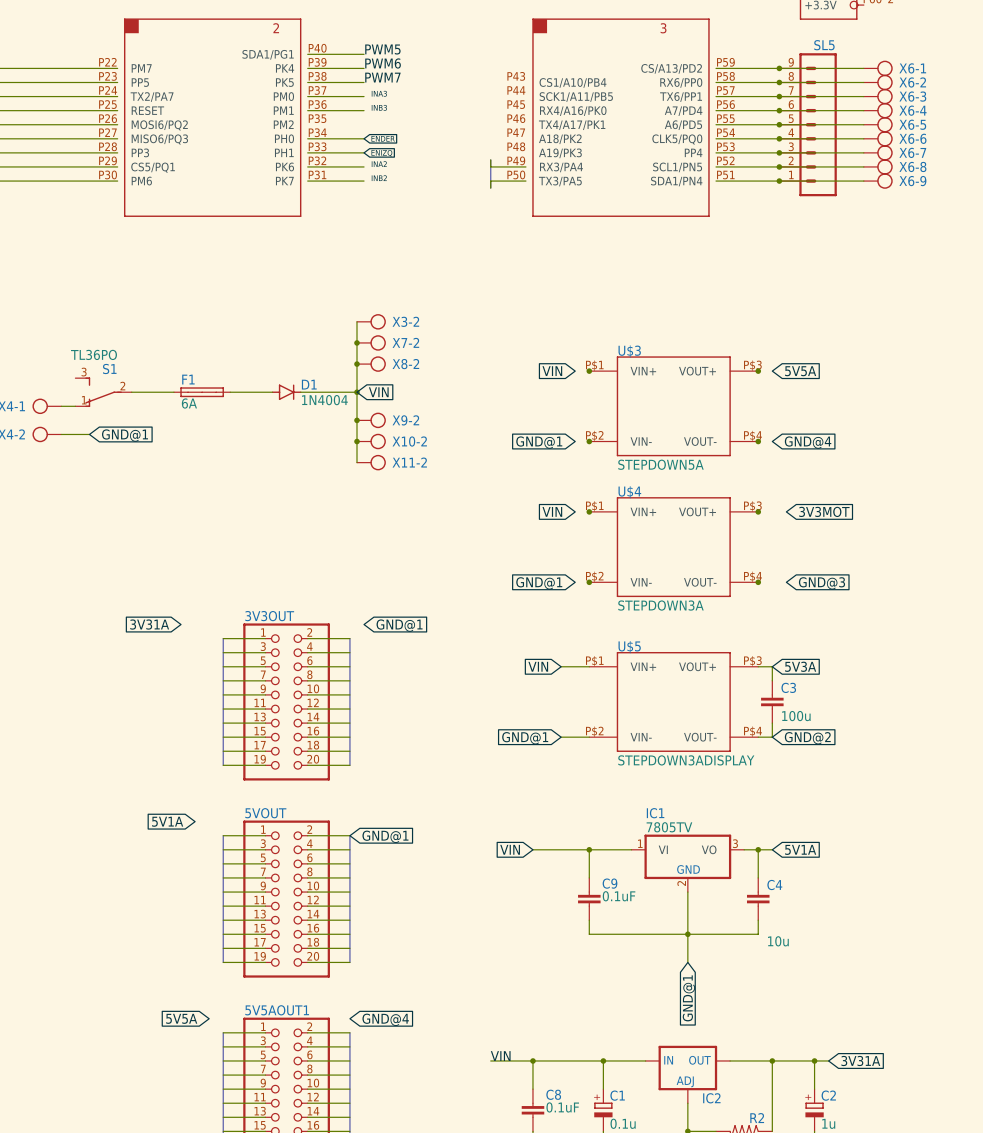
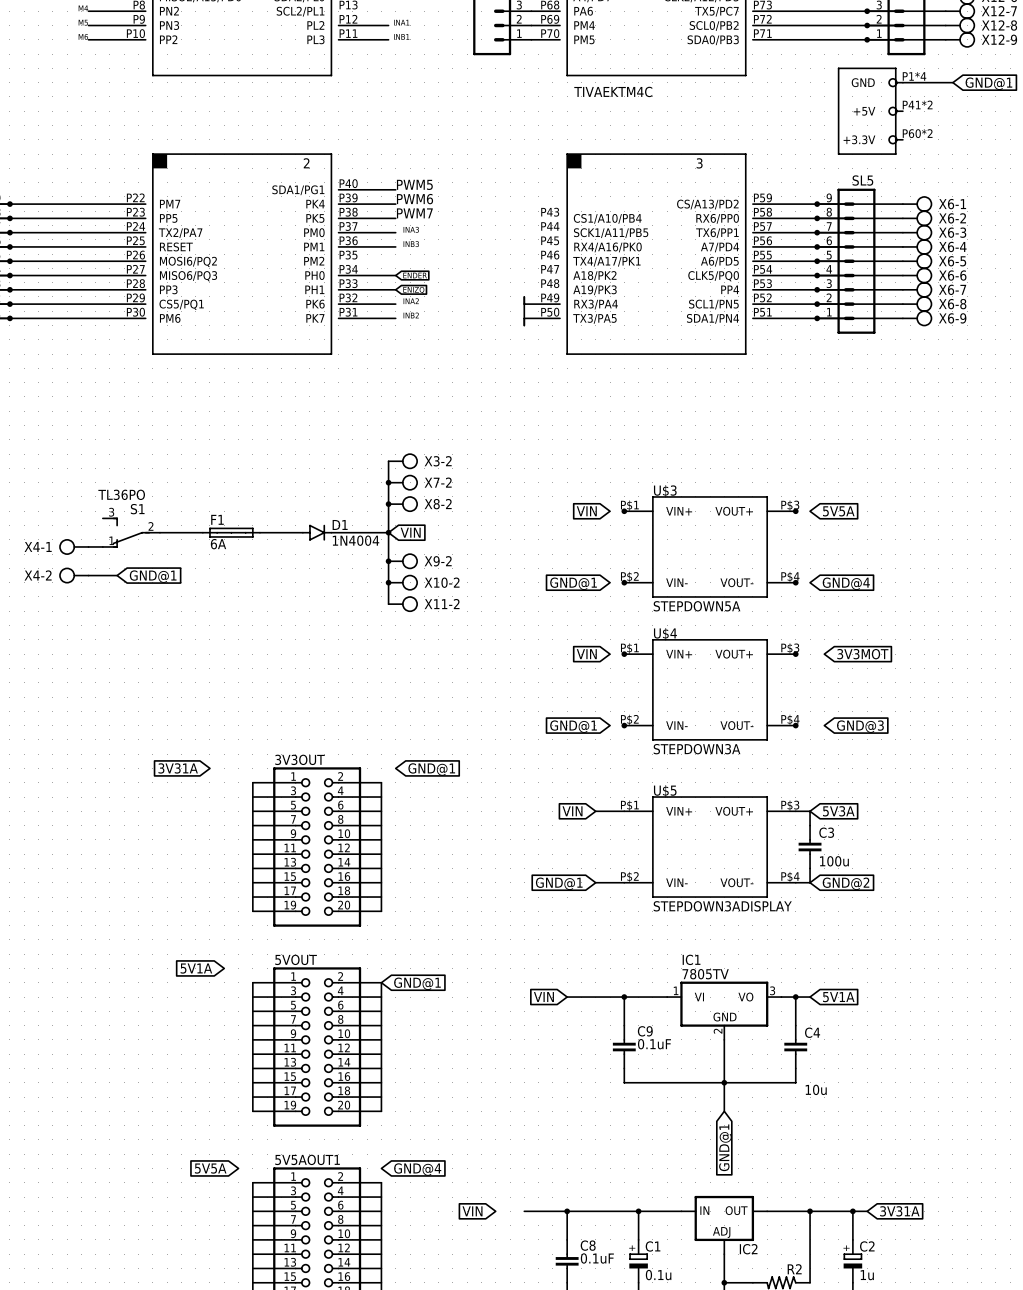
label: VIN (500, 1056) -> none
global label: none -> VIN (472, 1211)

